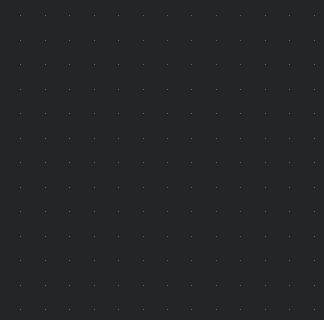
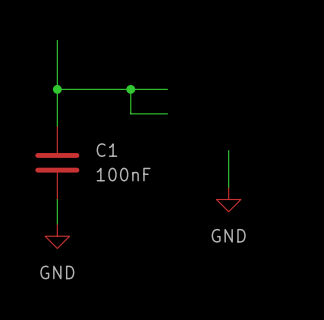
wire: none -> (57, 40) (57, 126)
wire: none -> (57, 89) (167, 89)
junction: none -> (57, 89)
wire: none -> (130, 89) (130, 113) (167, 113)
junction: none -> (130, 89)
wire: none -> (228, 150) (228, 187)
C1: none -> 100nF (57, 162)
wire: none -> (57, 199) (57, 223)
power symbol: none -> GND (228, 199)
power symbol: none -> GND (57, 236)

